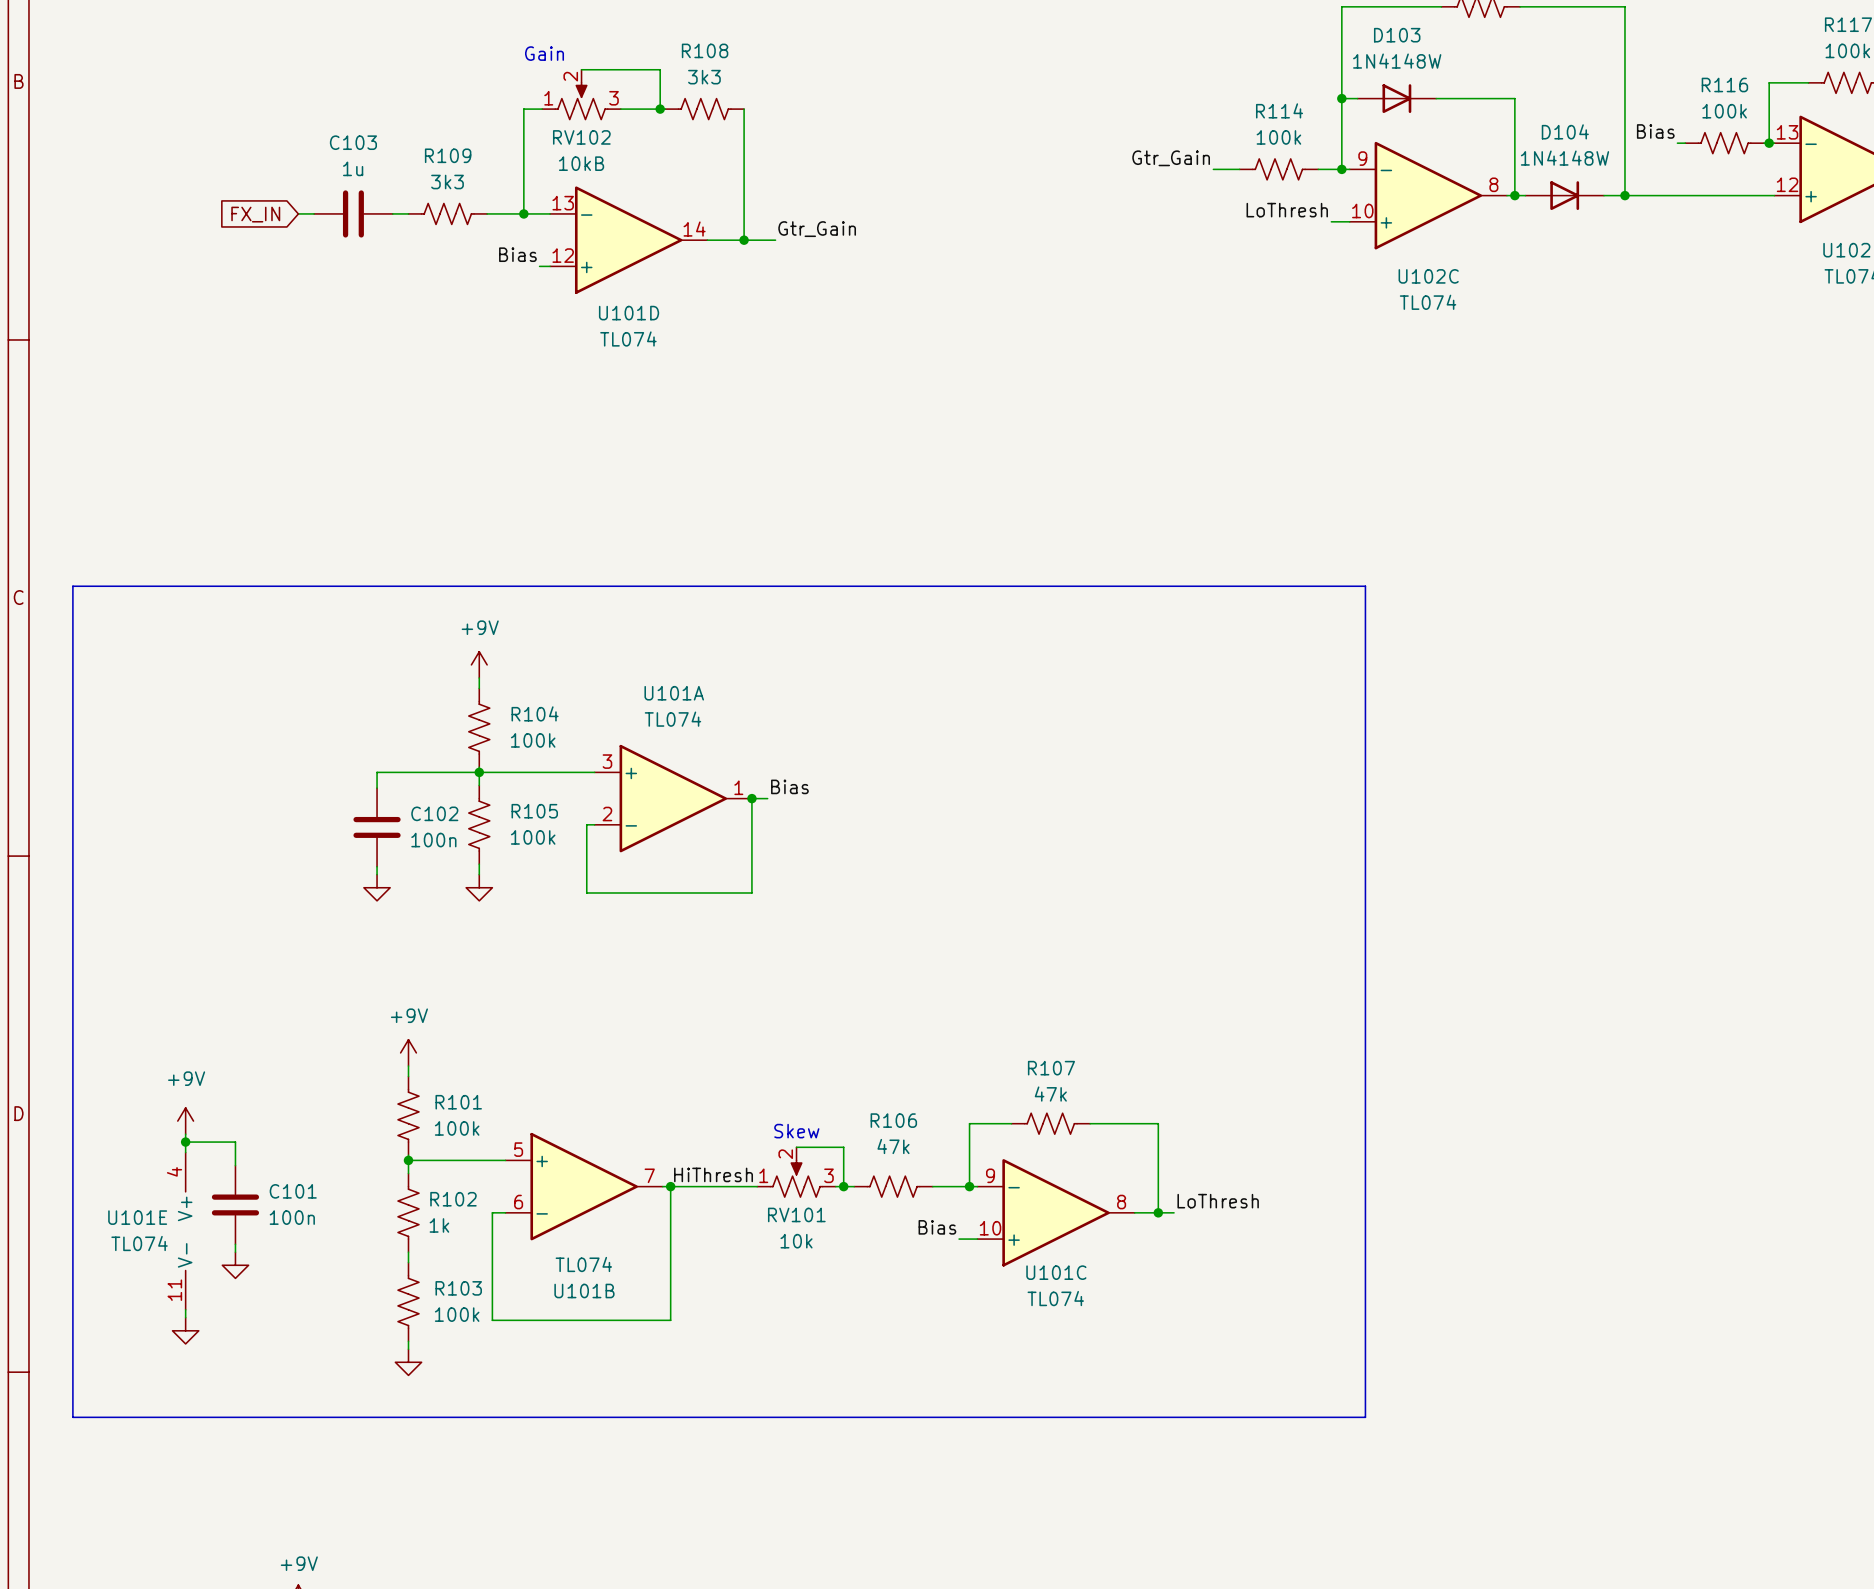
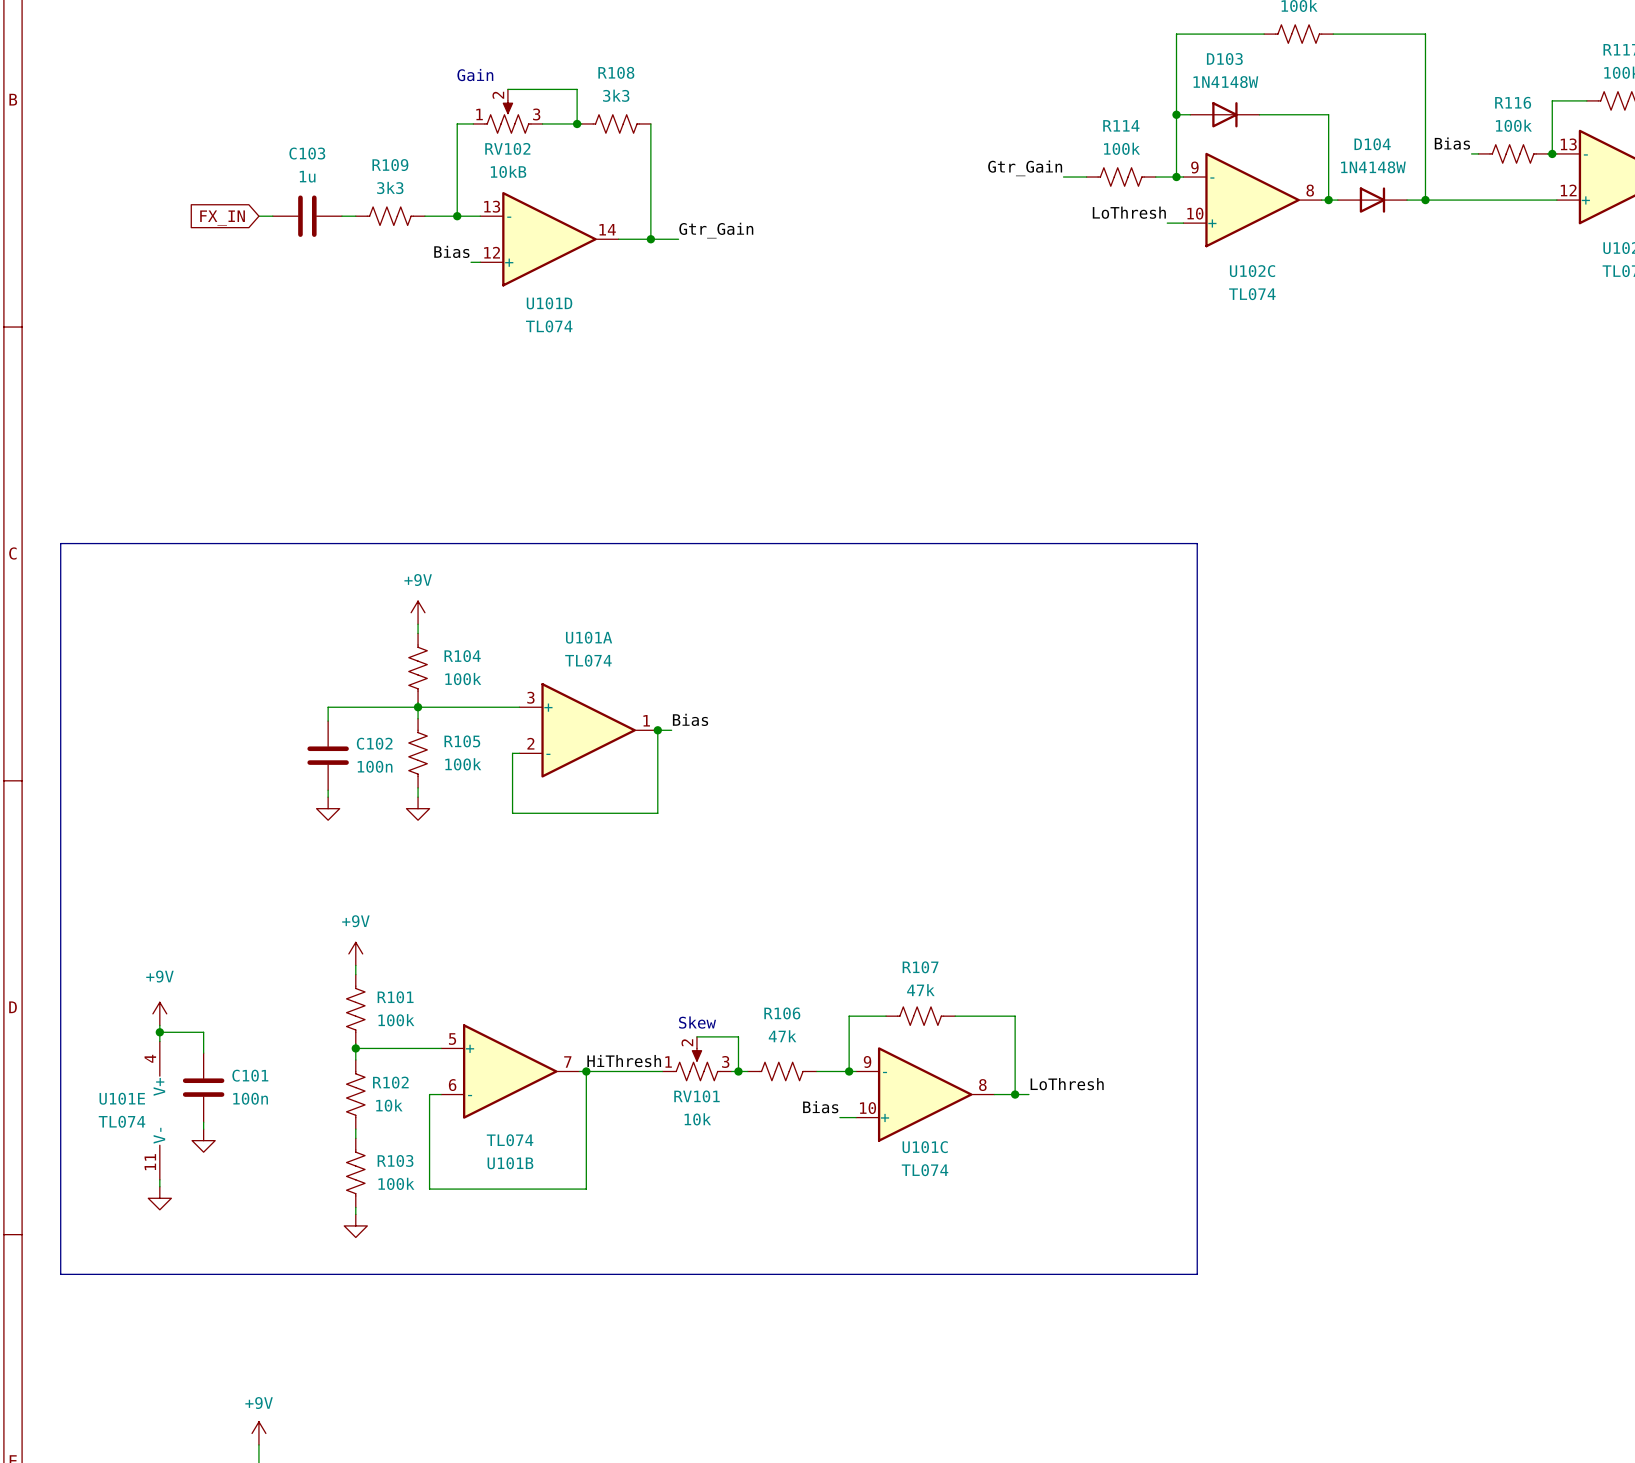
R102 value: 1k (439, 1225) -> 10k (389, 1105)

